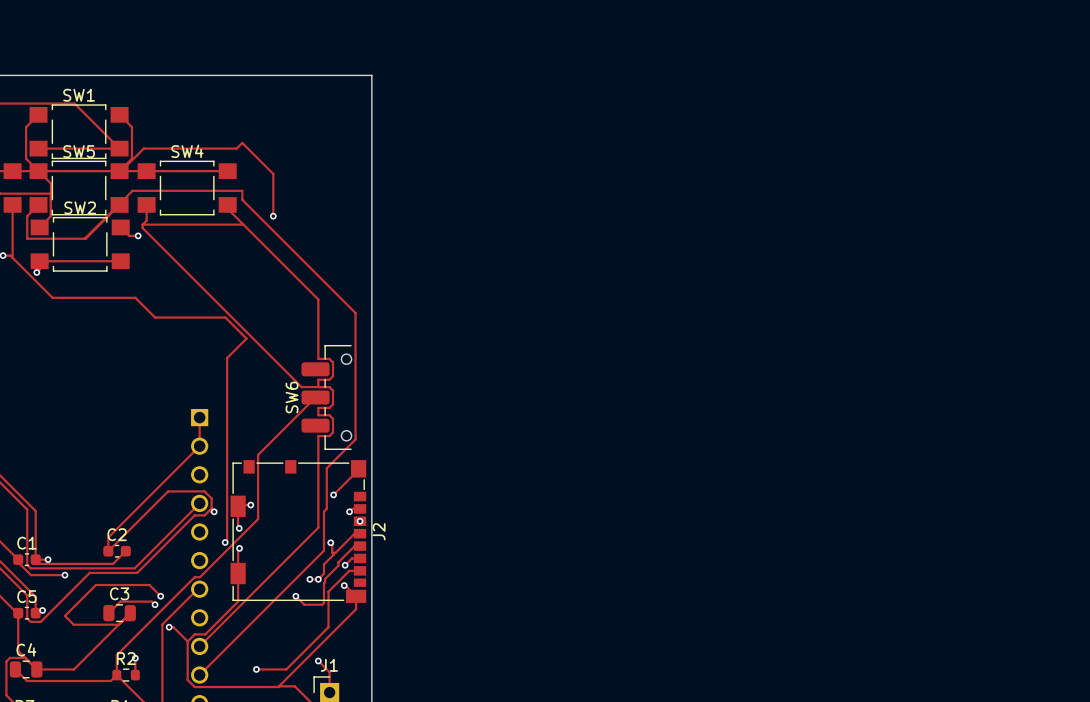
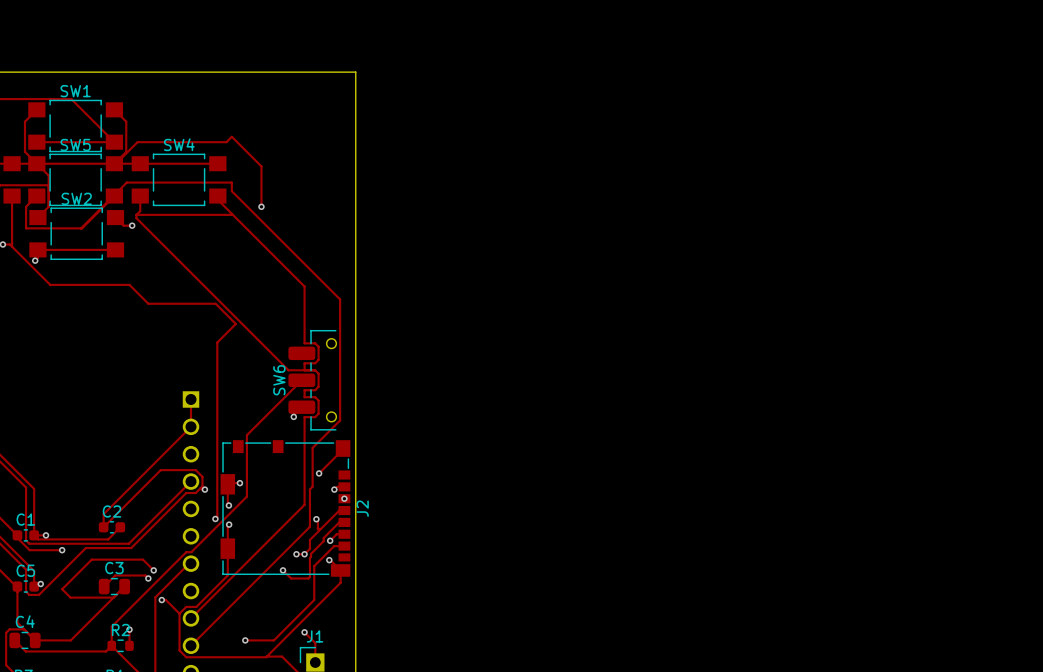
via: none -> (293, 416)

